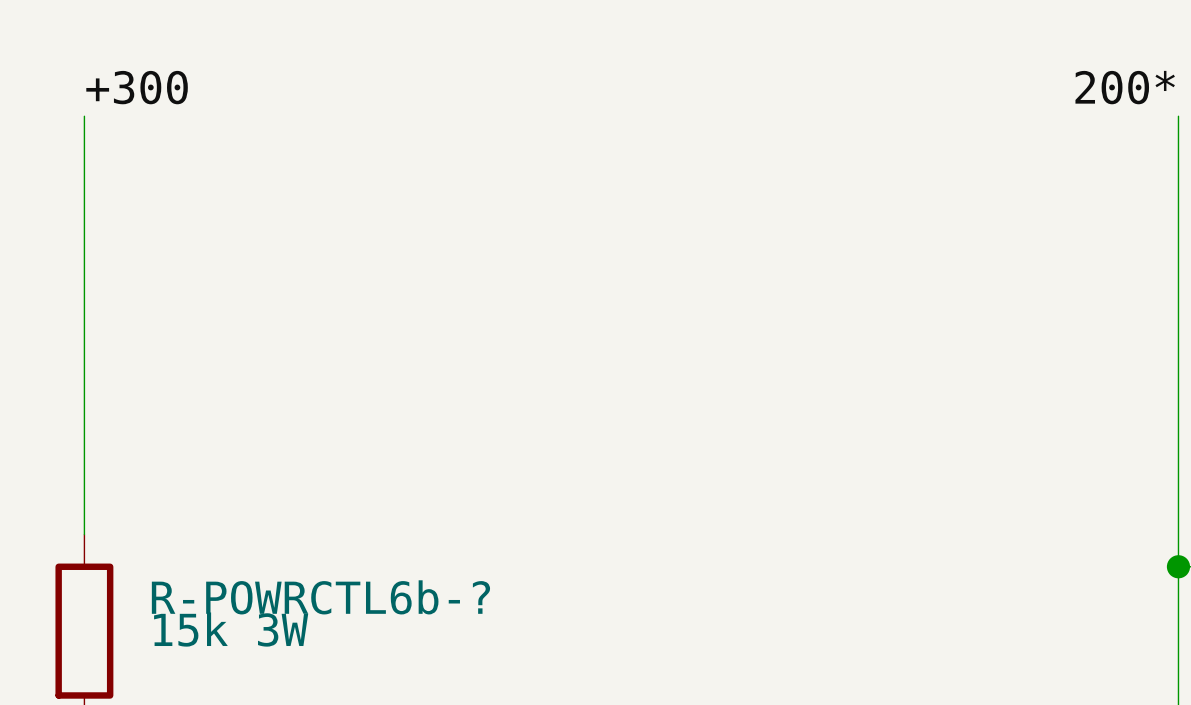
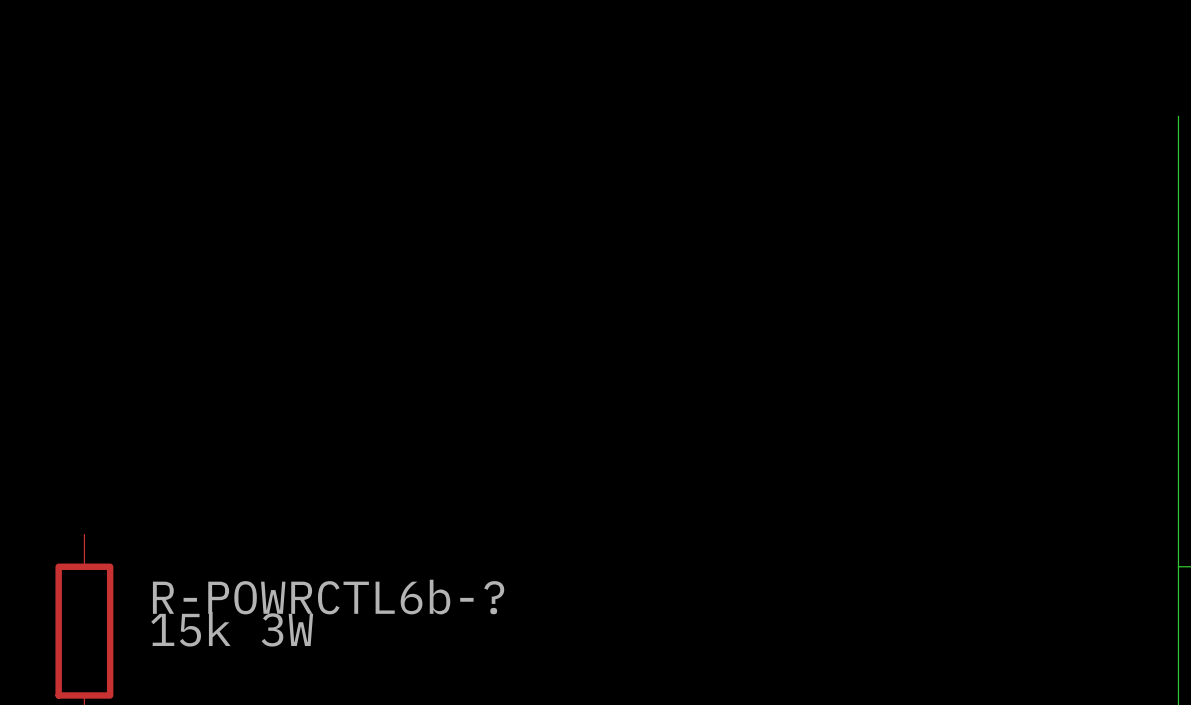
label: +300 (137, 87) -> none
label: 200* (1125, 87) -> none
wire: (84, 116) (84, 534) -> none
junction: (1178, 566) -> none

